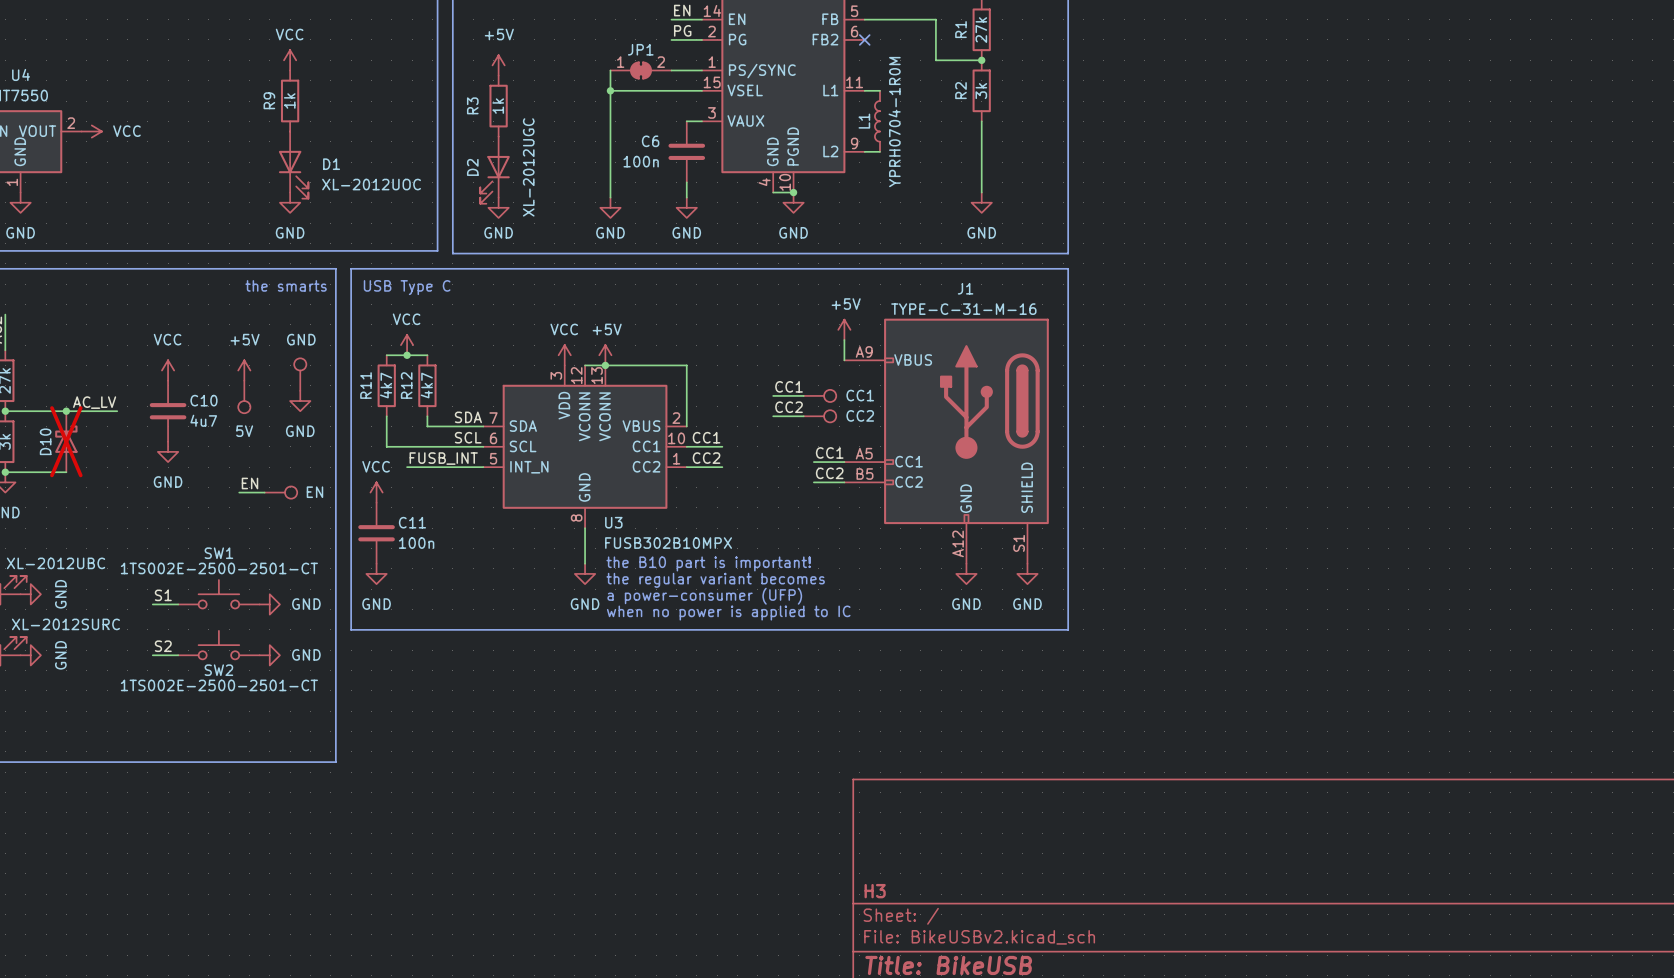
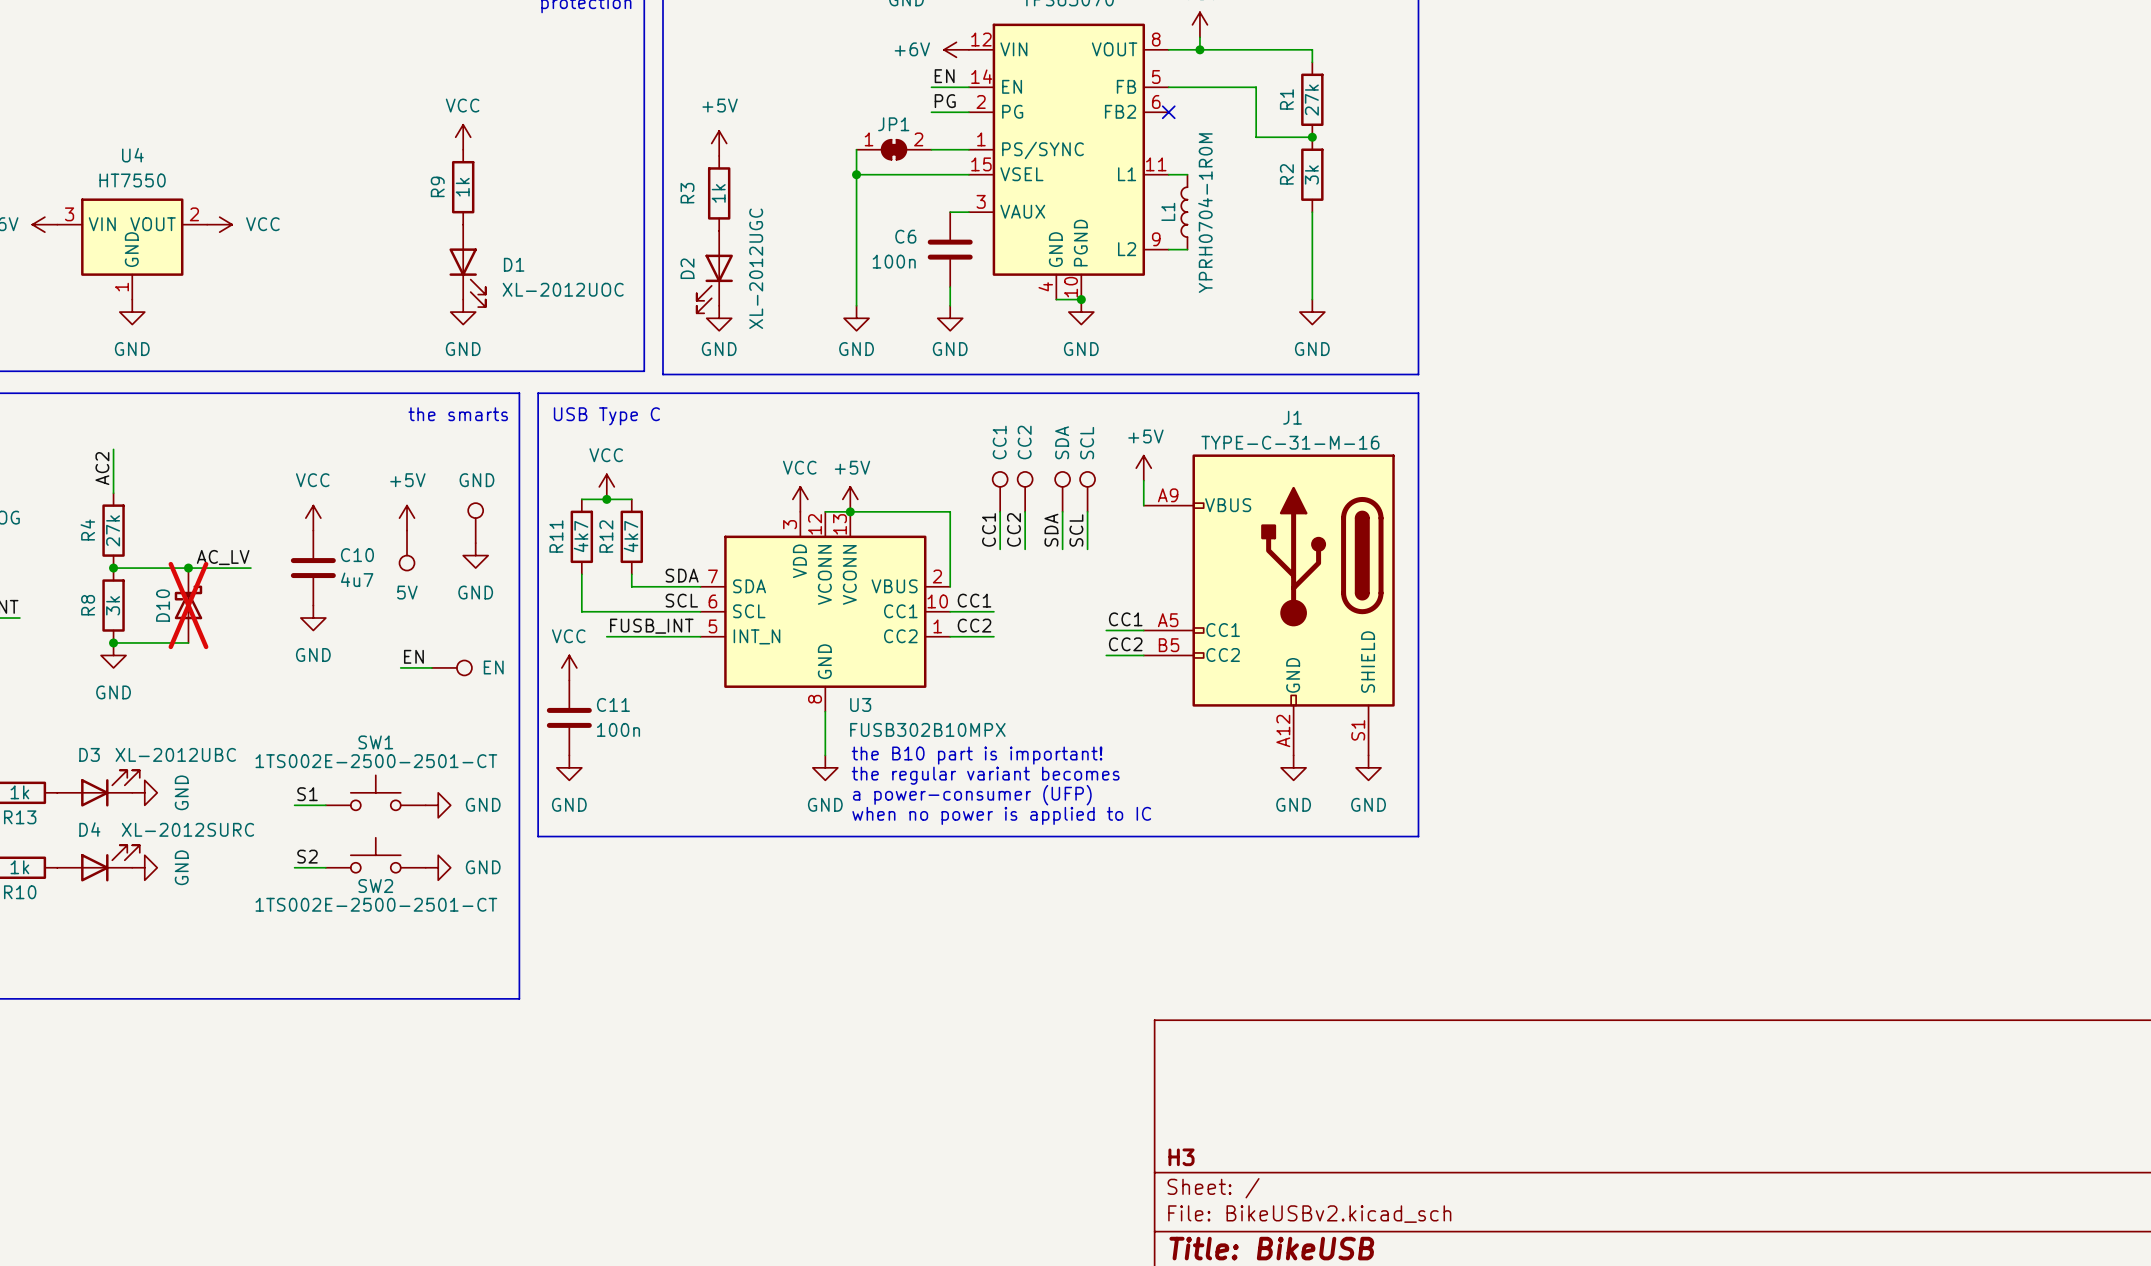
part: none -> SDA (1062, 491)
part: none -> SCL (1087, 491)
wire: none -> (1000, 511) (1000, 549)
wire: none -> (1025, 511) (1025, 549)
wire: none -> (1062, 511) (1062, 549)
wire: none -> (1087, 511) (1087, 549)
label: none -> SDA (1051, 530)
label: none -> SCL (1076, 530)
label rotation: 0° (789, 386) -> 90° counterclockwise (989, 529)
label position: CC1 (789, 386) -> CC1 (989, 529)
wire: (773, 395) (803, 395) -> none
part position: (819, 395) -> (1000, 491)
part rotation: 0° (830, 395) -> 90° counterclockwise (1000, 479)
label rotation: 0° (789, 407) -> 90° counterclockwise (1013, 529)
label position: CC2 (789, 407) -> CC2 (1013, 529)
wire: (773, 416) (803, 416) -> none
part position: (819, 416) -> (1025, 491)
part rotation: 0° (830, 416) -> 90° counterclockwise (1025, 479)

